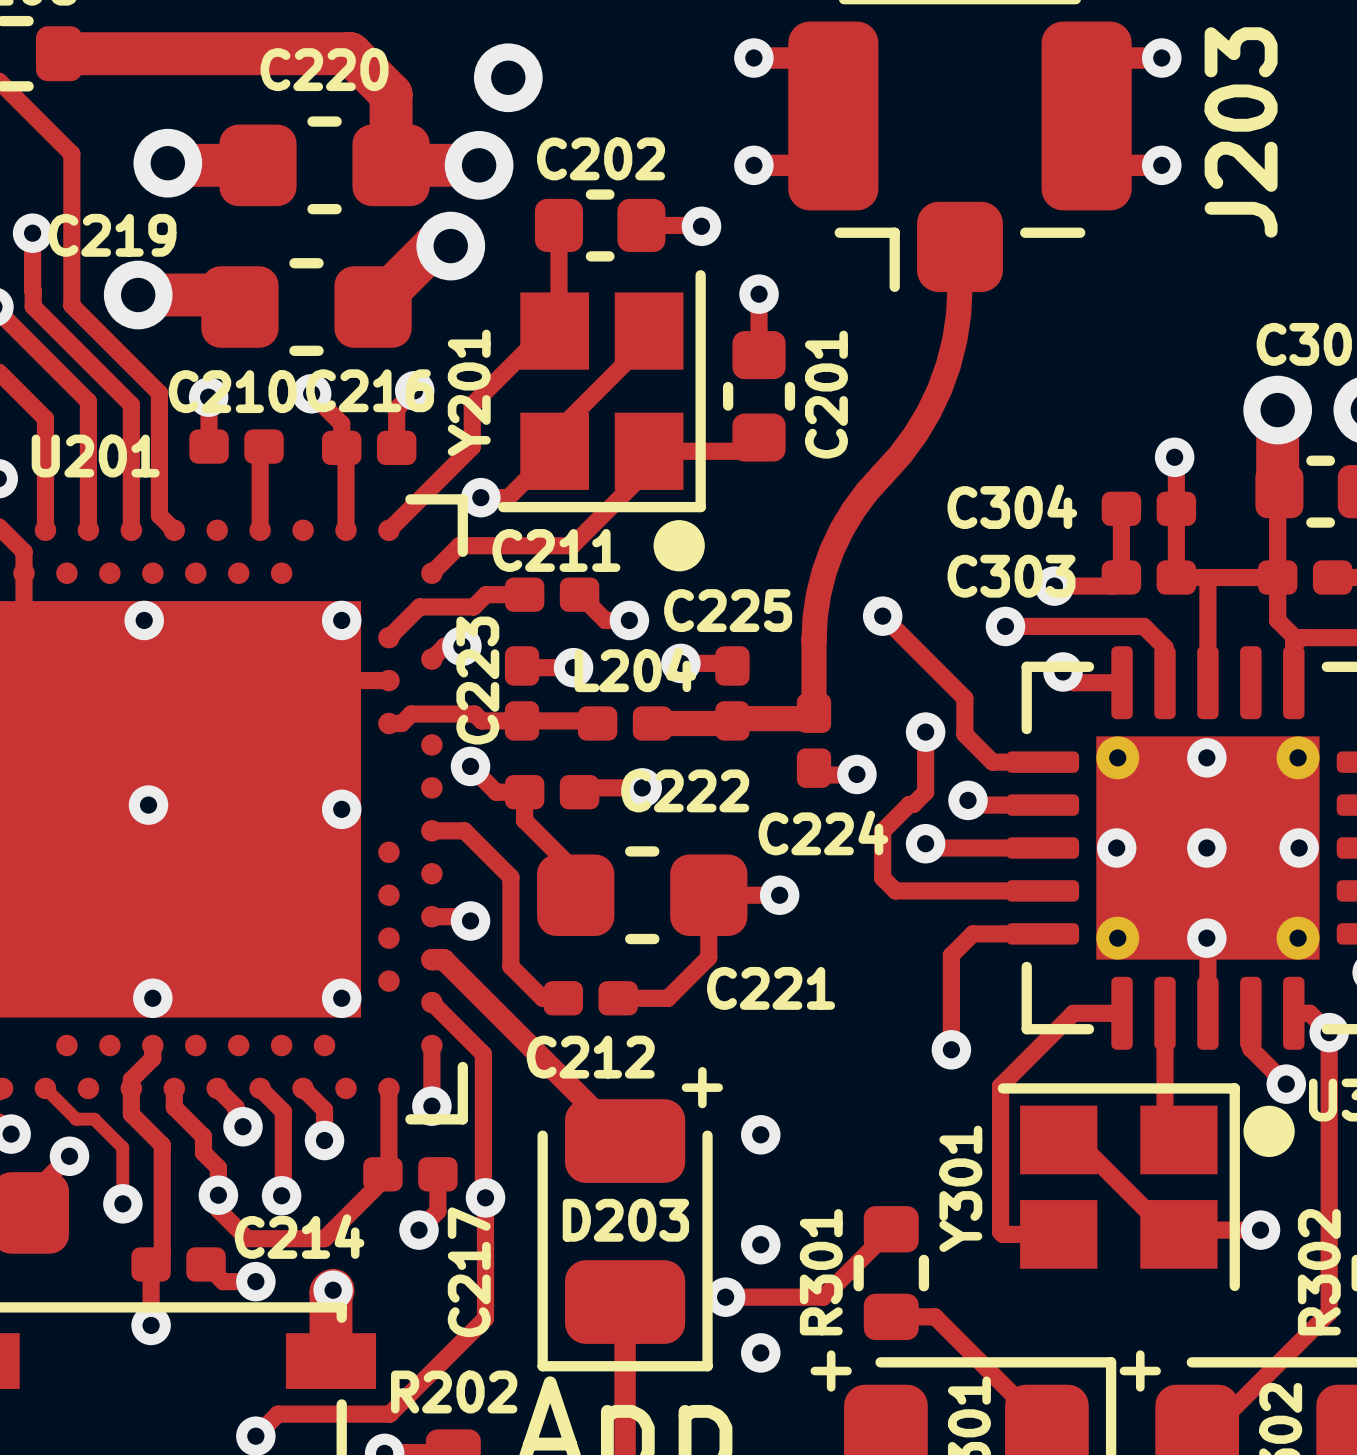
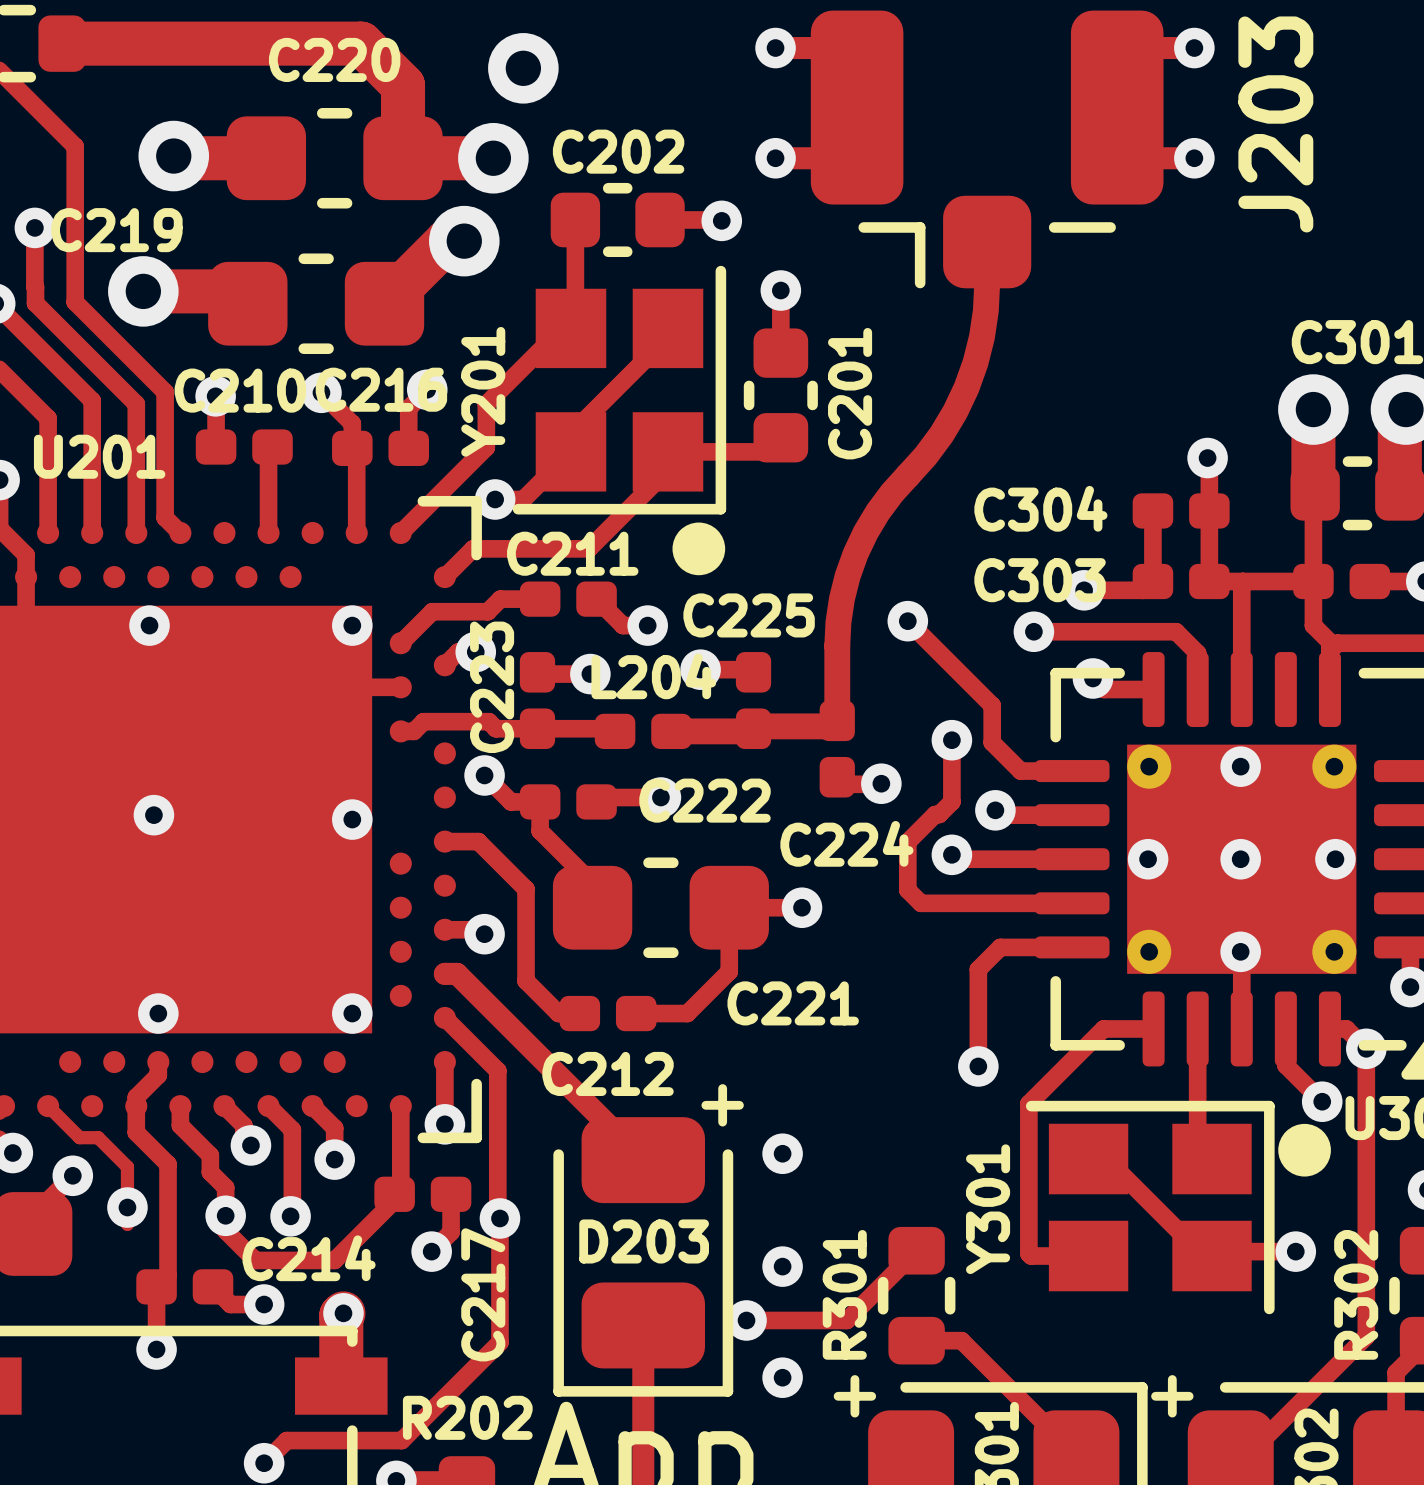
via position: (122, 1203) -> (127, 1207)

